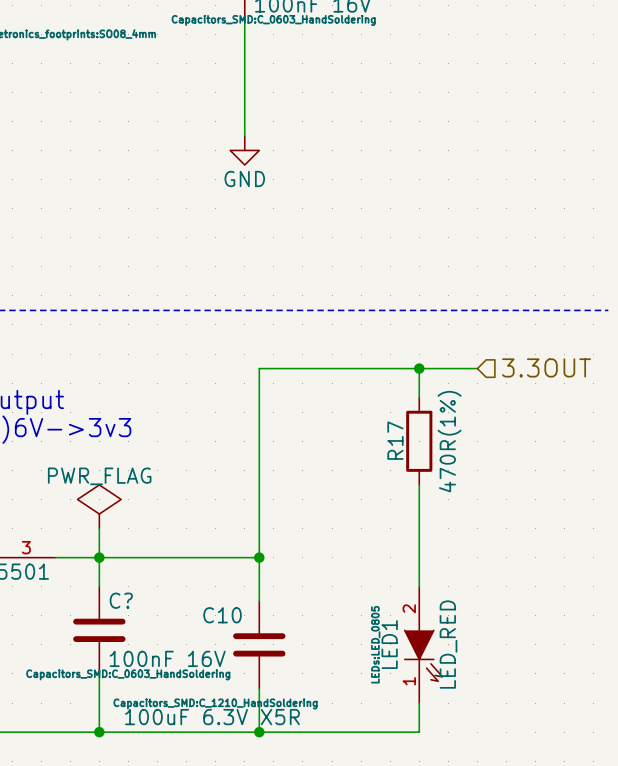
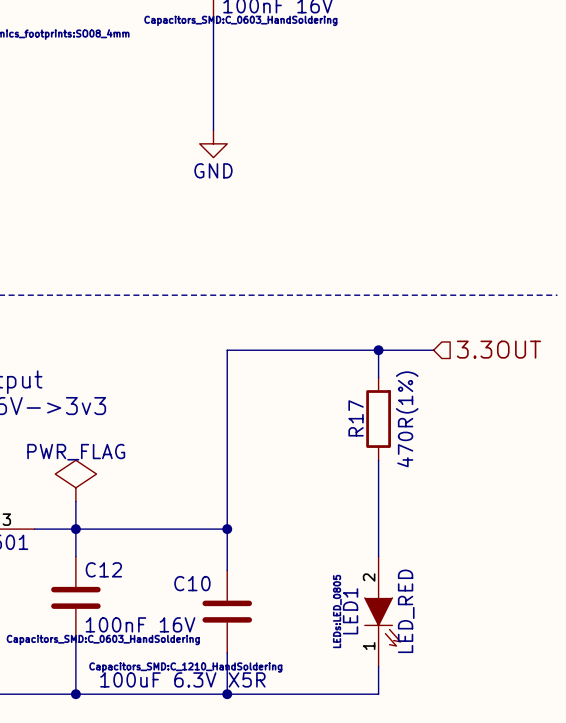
C? name: C? (121, 600) -> C12 (103, 569)

